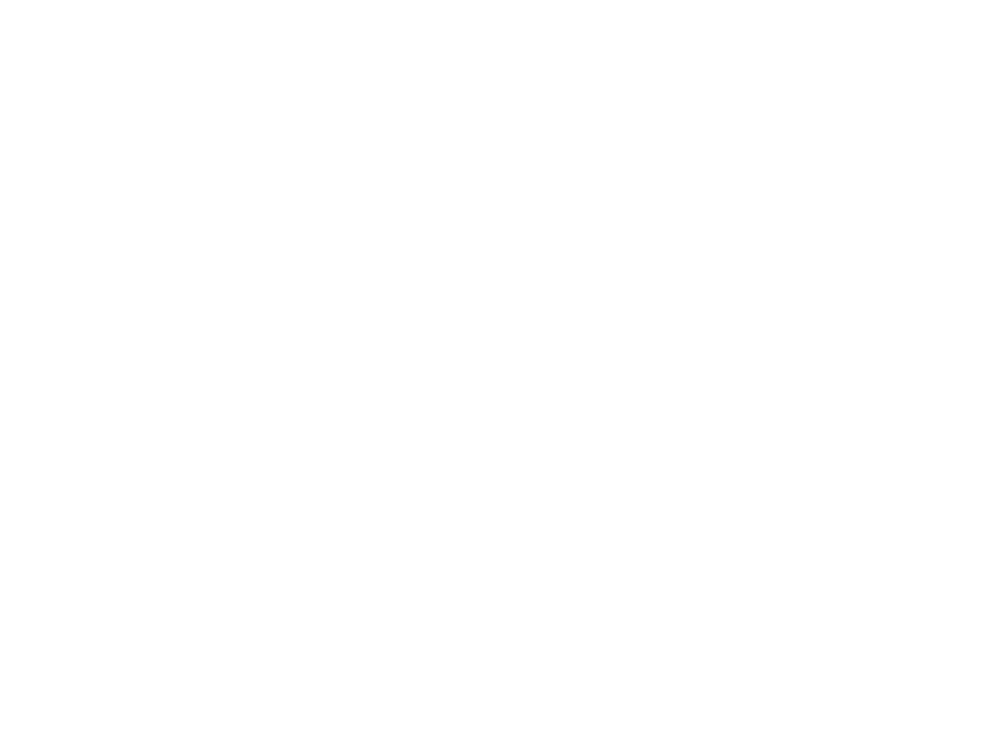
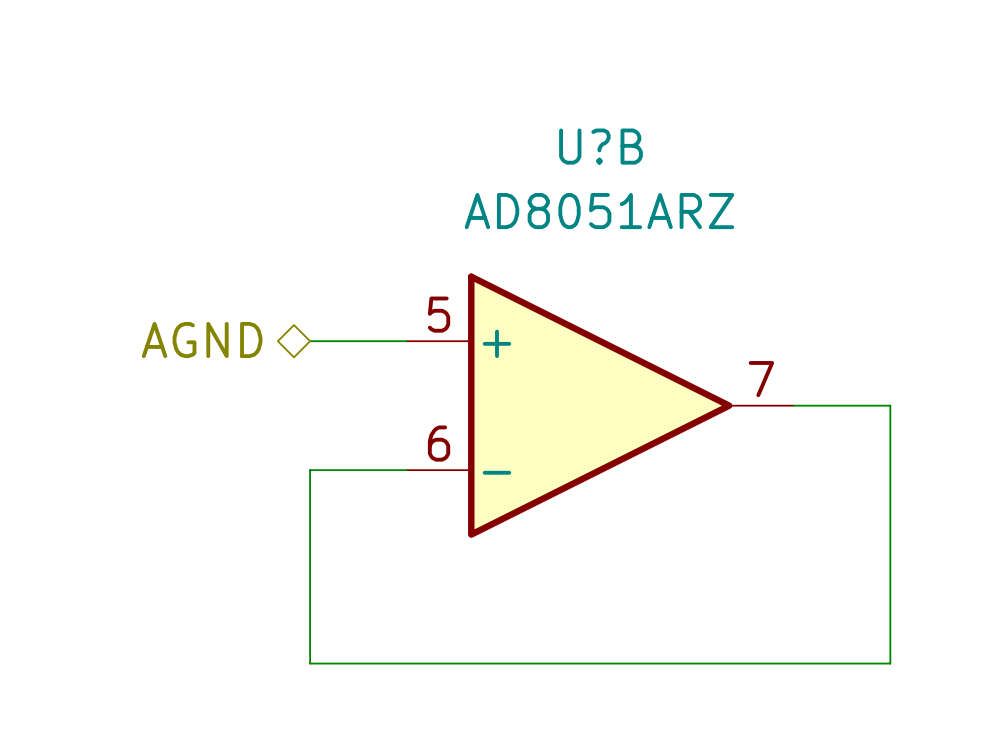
hierarchical label: none -> AGND (202, 340)
wire: none -> (310, 341) (406, 341)
U?B: none -> AD8051ARZ (600, 405)
wire: none -> (793, 405) (890, 405) (890, 663) (310, 663) (310, 470) (406, 470)

